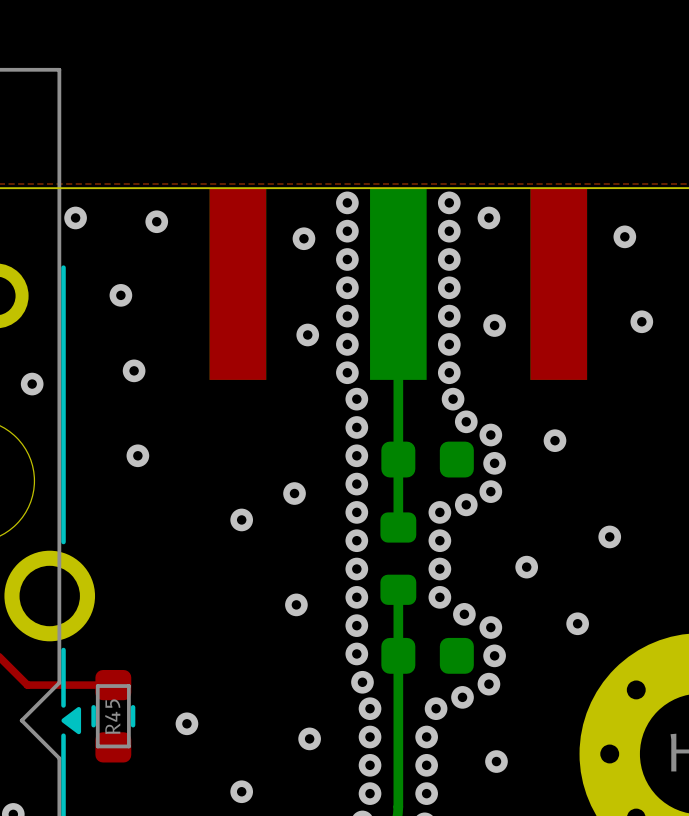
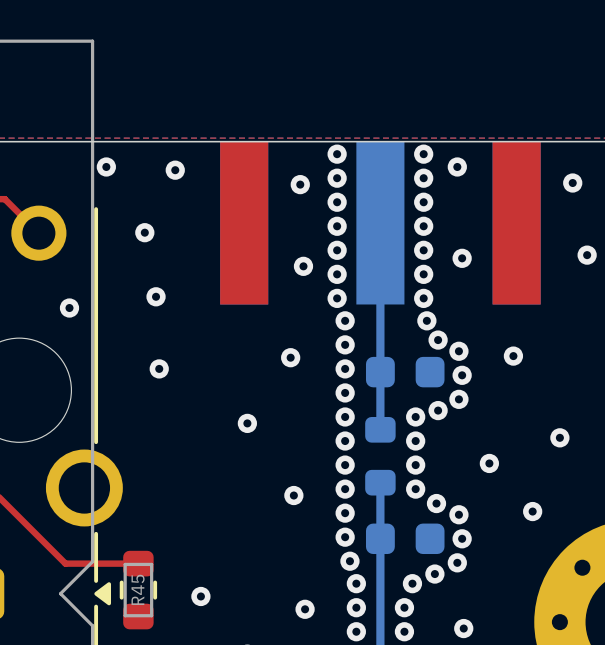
via position: (294, 493) -> (290, 357)

